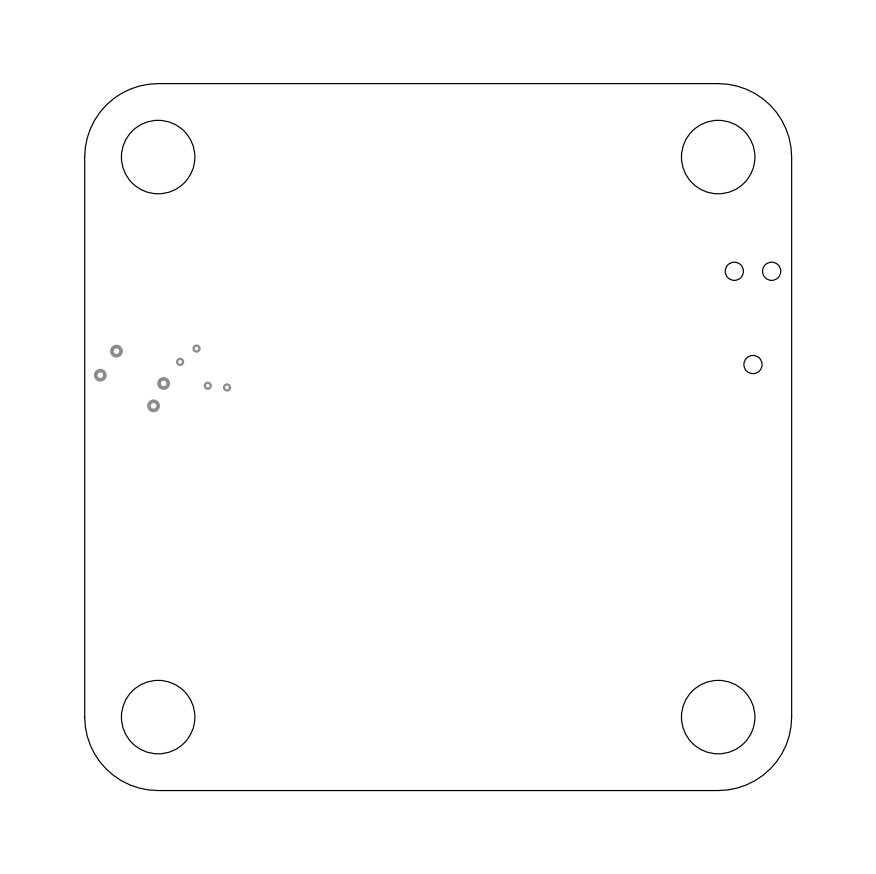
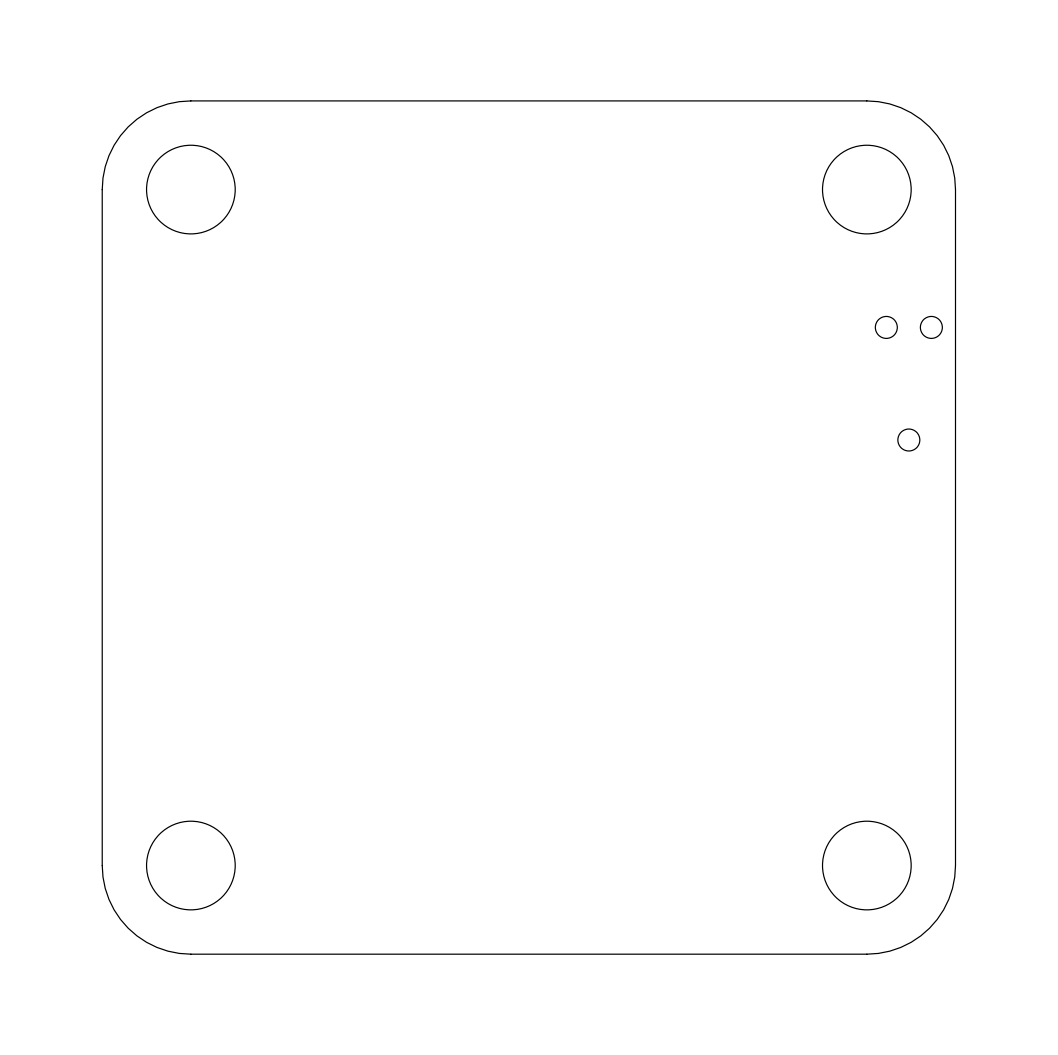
via: (196, 348) -> none
via: (116, 351) -> none
via: (180, 361) -> none
via: (100, 375) -> none
via: (163, 383) -> none
via: (207, 385) -> none
via: (227, 387) -> none
via: (153, 405) -> none

